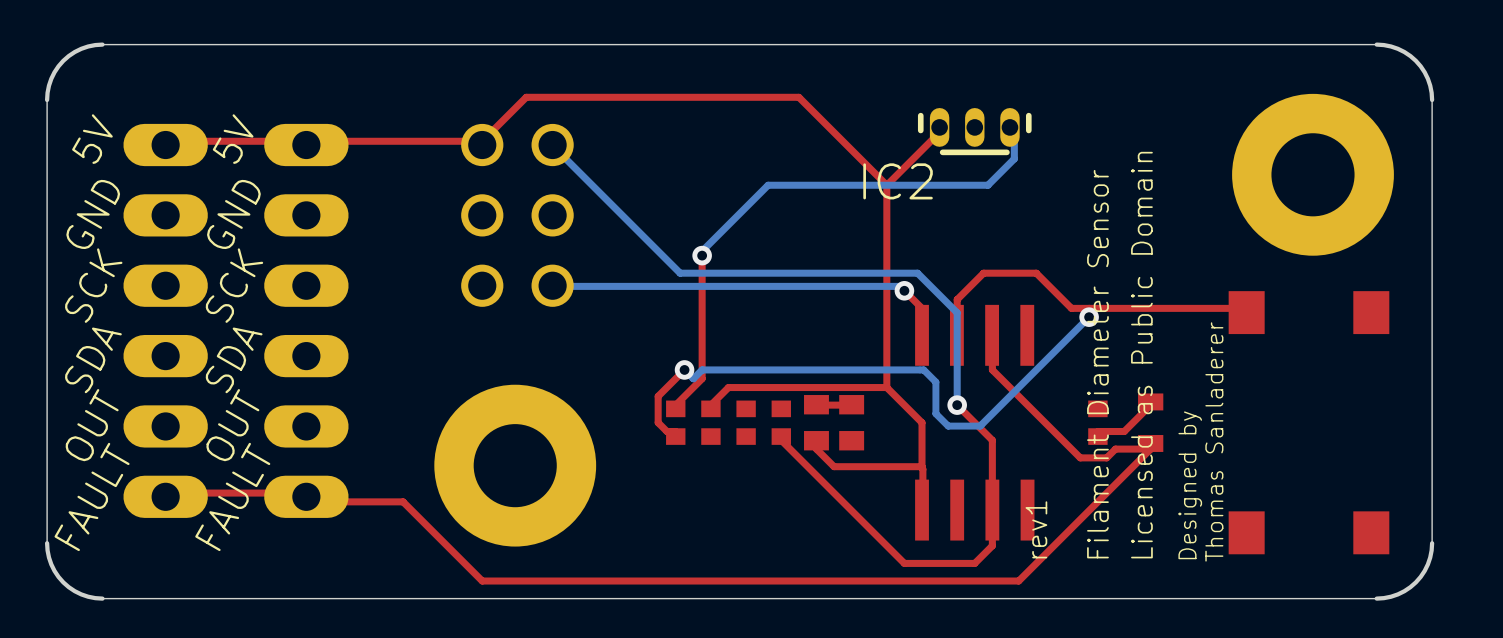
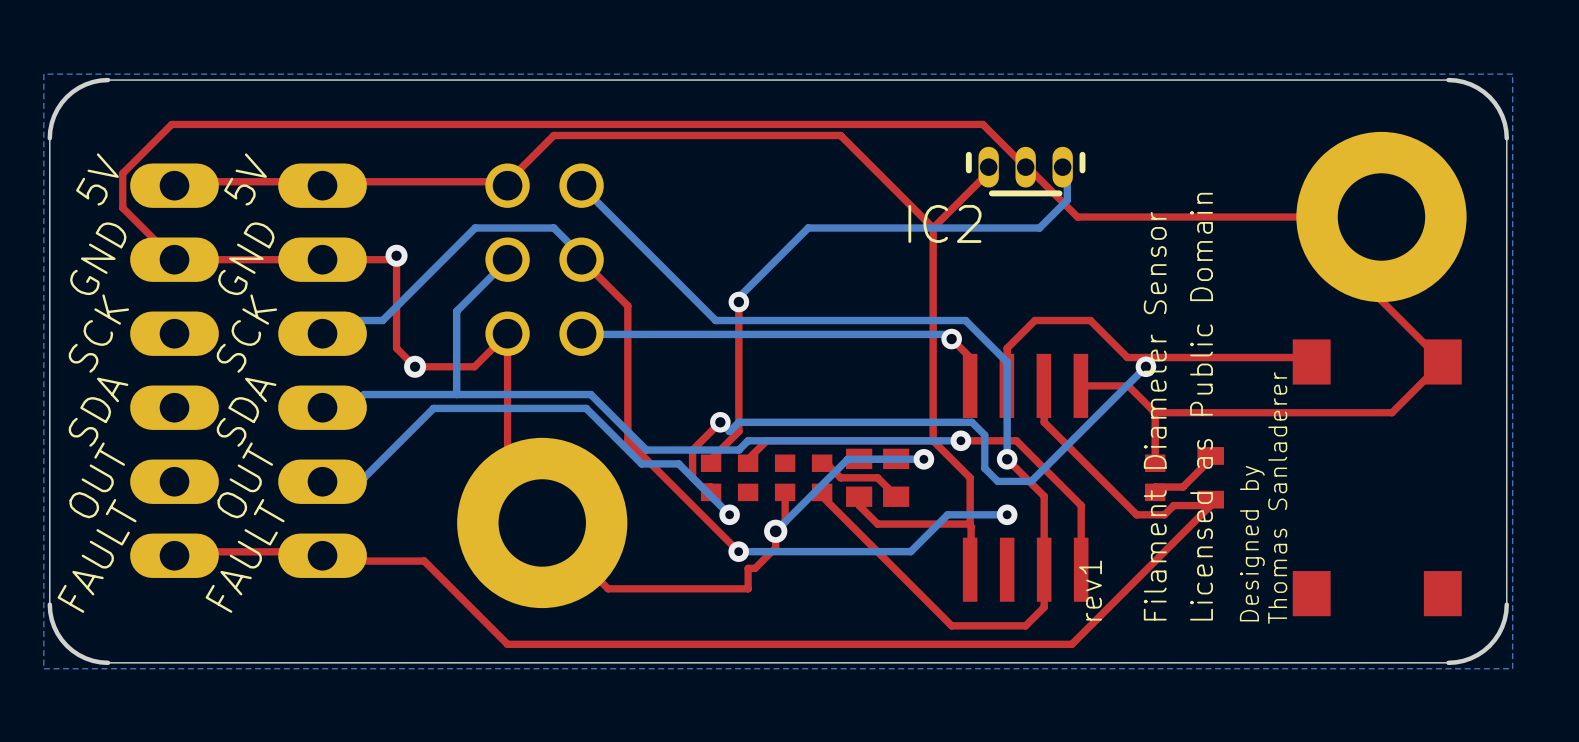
bottom zone outline: none -> (1512, 74) (1512, 668) (43, 668) (43, 74) (1512, 74)
via: none -> (396, 255)
bottom track: none -> (507, 259) (456, 311) (456, 394)
top track: none -> (581, 259) (627, 305) (627, 440) (738, 551)
bottom track: none -> (581, 259) (581, 255) (553, 228) (475, 228) (382, 320) (331, 320) (322, 329) (322, 333)
via: none -> (415, 366)
top track: none -> (1080, 385) (1128, 385) (1155, 412) (1392, 412) (1442, 361) (1381, 300) (1381, 217) (1077, 217) (982, 124) (171, 124) (122, 173) (122, 207) (174, 259) (392, 259) (396, 255) (396, 348) (415, 366) (474, 366) (507, 333) (507, 488) (608, 588) (748, 588) (748, 568) (755, 568) (775, 547) (775, 531) (785, 521) (785, 492)
bottom track: none -> (322, 407) (322, 403) (354, 403) (364, 394) (590, 394) (646, 450) (738, 450) (748, 440) (960, 440) (965, 445)
top track: none -> (1155, 413) (1155, 463)
top track: none -> (960, 440) (1016, 440) (1081, 505) (1081, 569)
via: none -> (960, 440)
bottom track: none -> (923, 459) (847, 459) (775, 531)
via: none -> (923, 459)
top track: none -> (822, 463) (822, 459) (840, 477) (877, 477) (896, 496)
bottom track: none -> (322, 481) (322, 477) (364, 477) (433, 408) (586, 408) (641, 463) (678, 463) (729, 514)
via: none -> (729, 514)
bottom track: none -> (1007, 514) (947, 514) (910, 551) (738, 551)
via: none -> (1007, 514)
via: none -> (775, 531)
via: none -> (738, 551)

